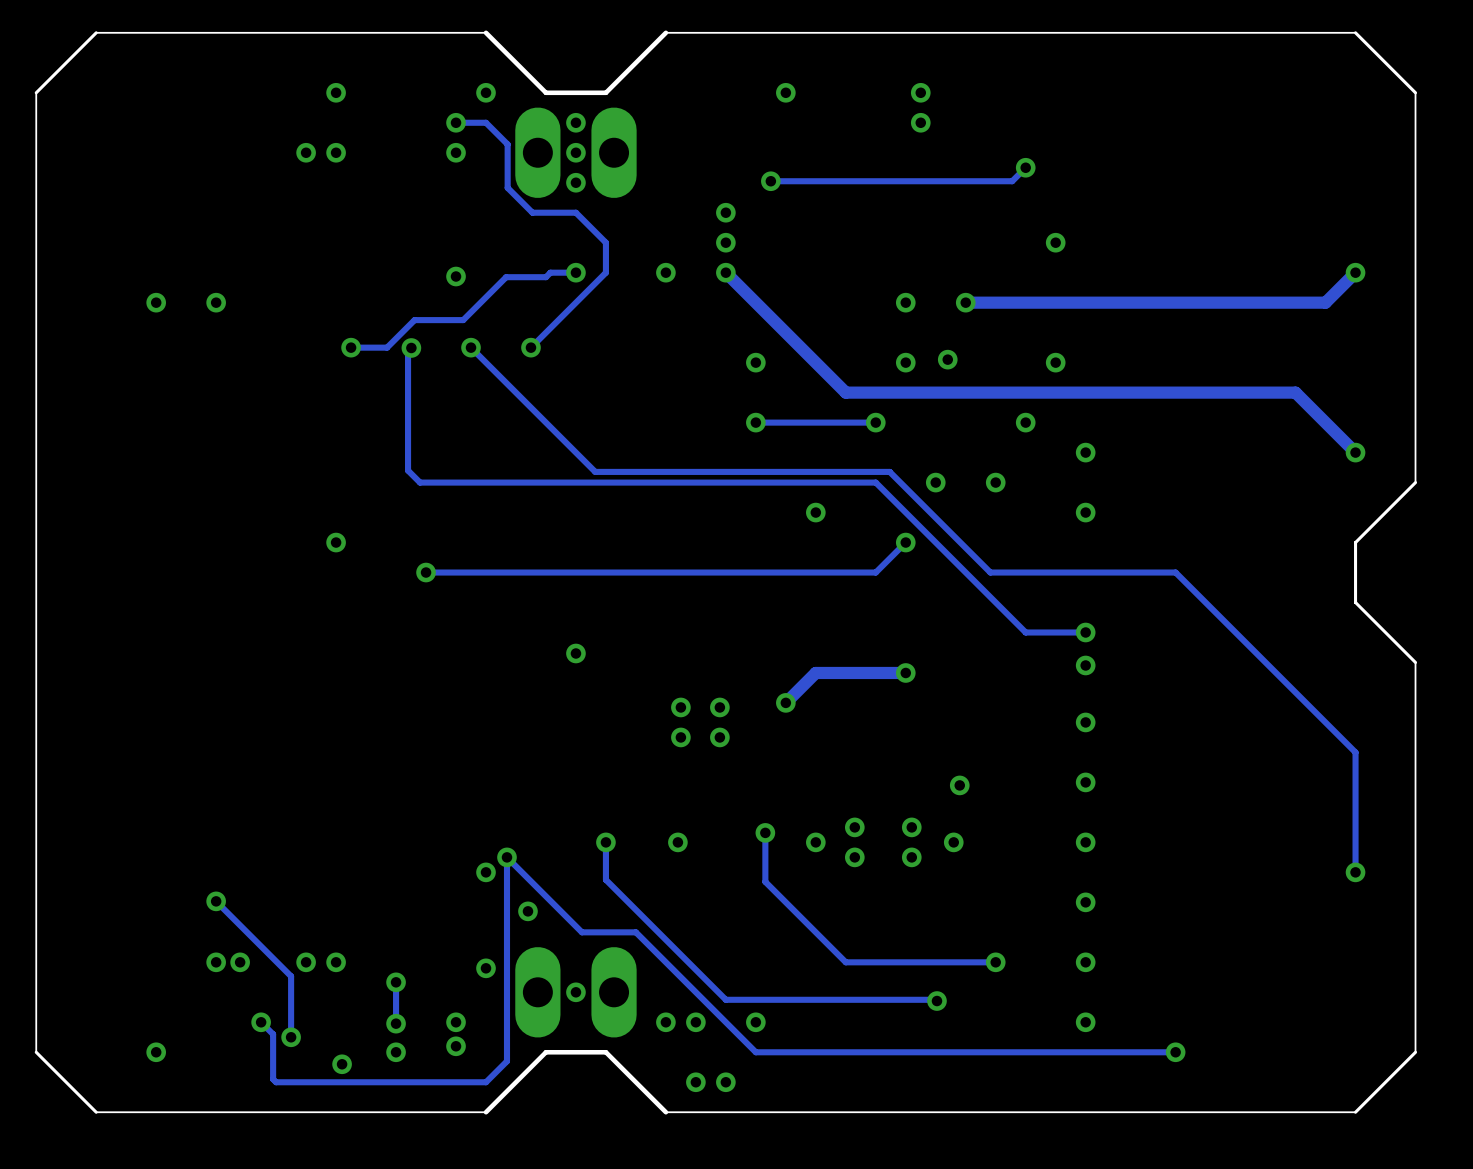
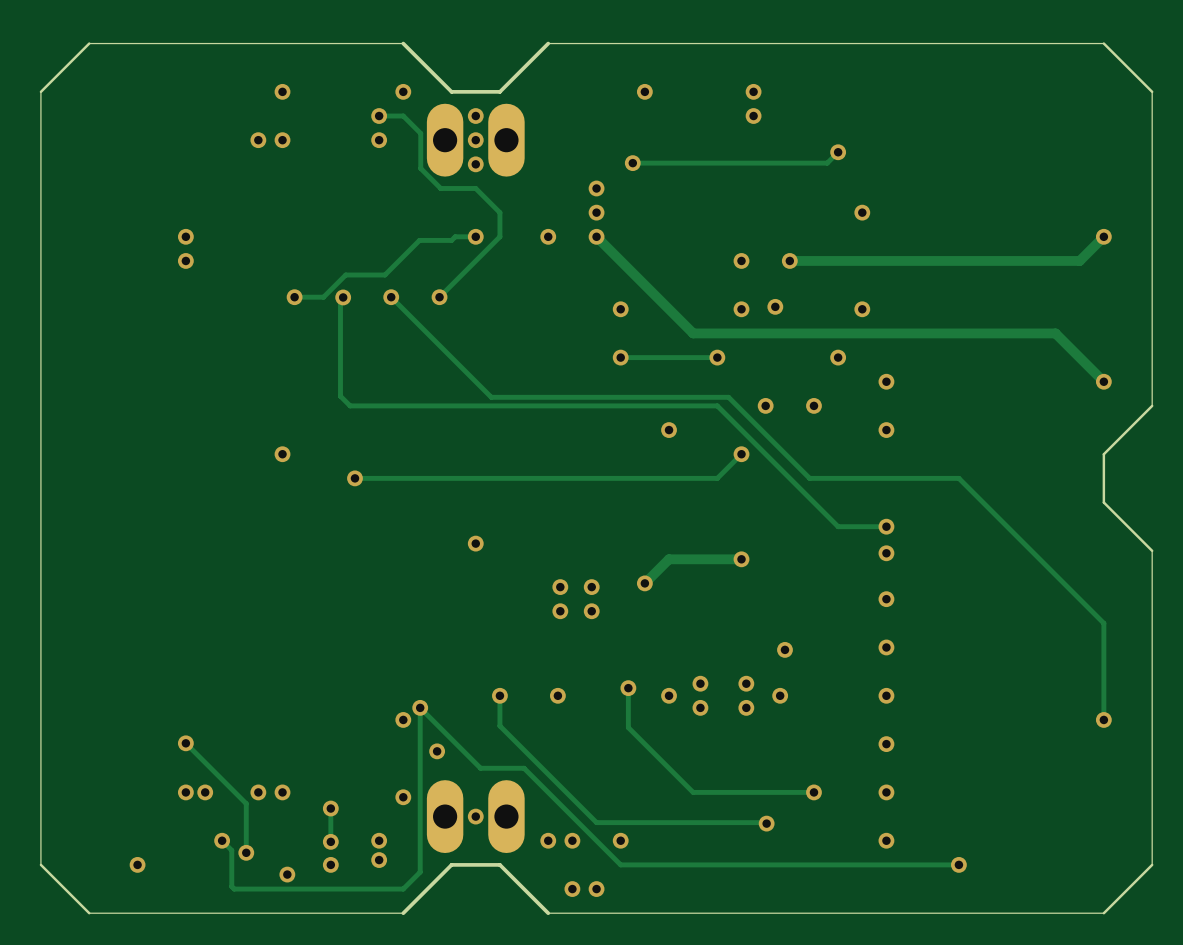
via: (456, 276) -> none
via position: (156, 302) -> (185, 236)

